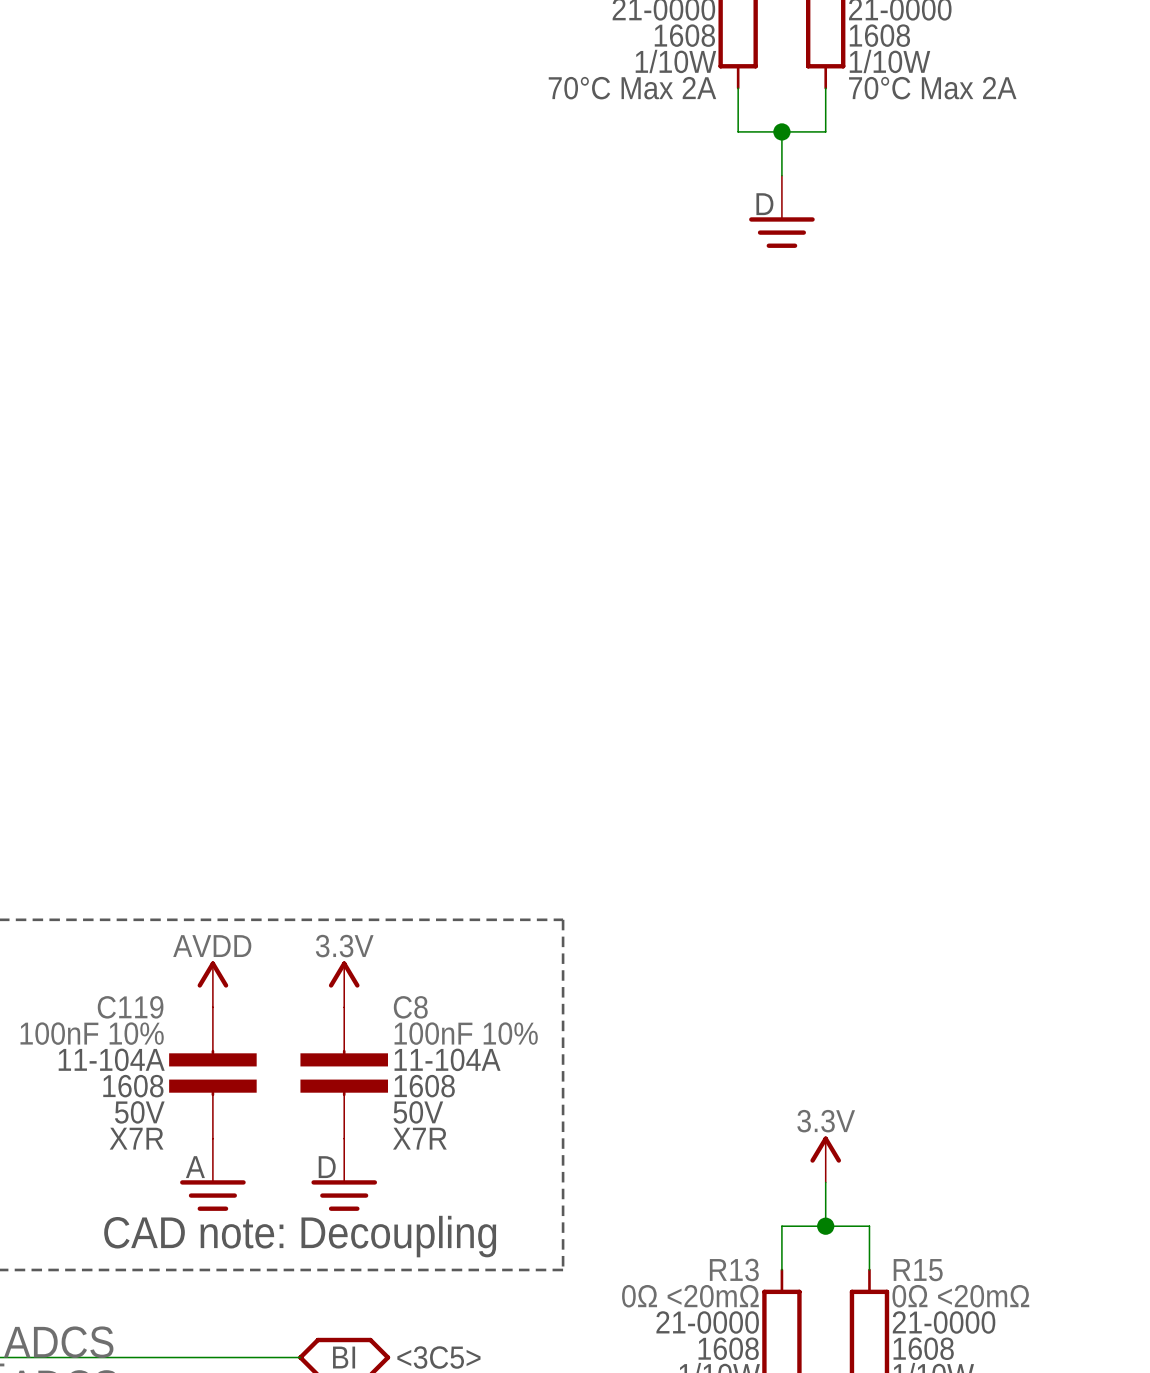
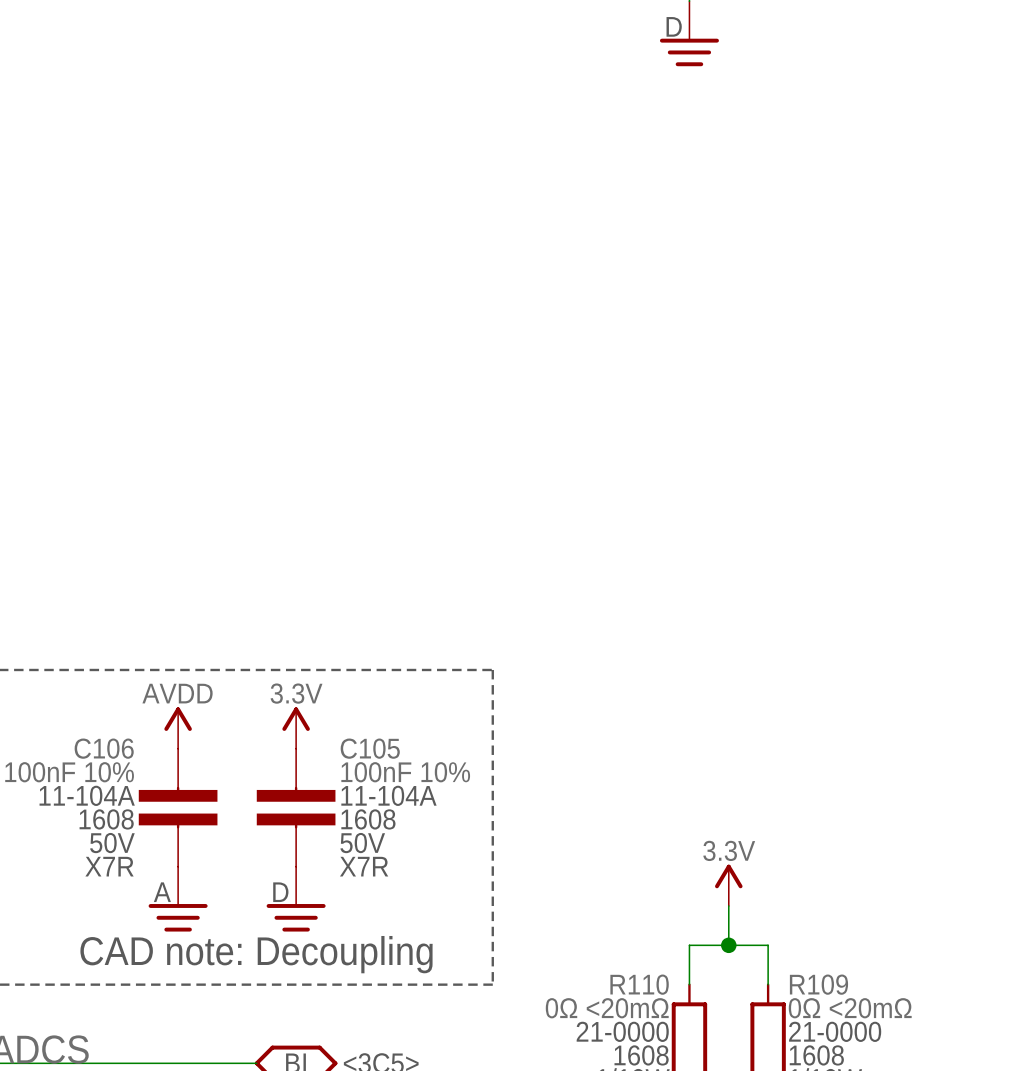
C119 name: C119 (130, 1007) -> C106 (104, 748)
C8 name: C8 (410, 1007) -> C105 (370, 748)
R13 name: R13 (734, 1269) -> R110 (639, 984)
R15 name: R15 (918, 1270) -> R109 (818, 984)

